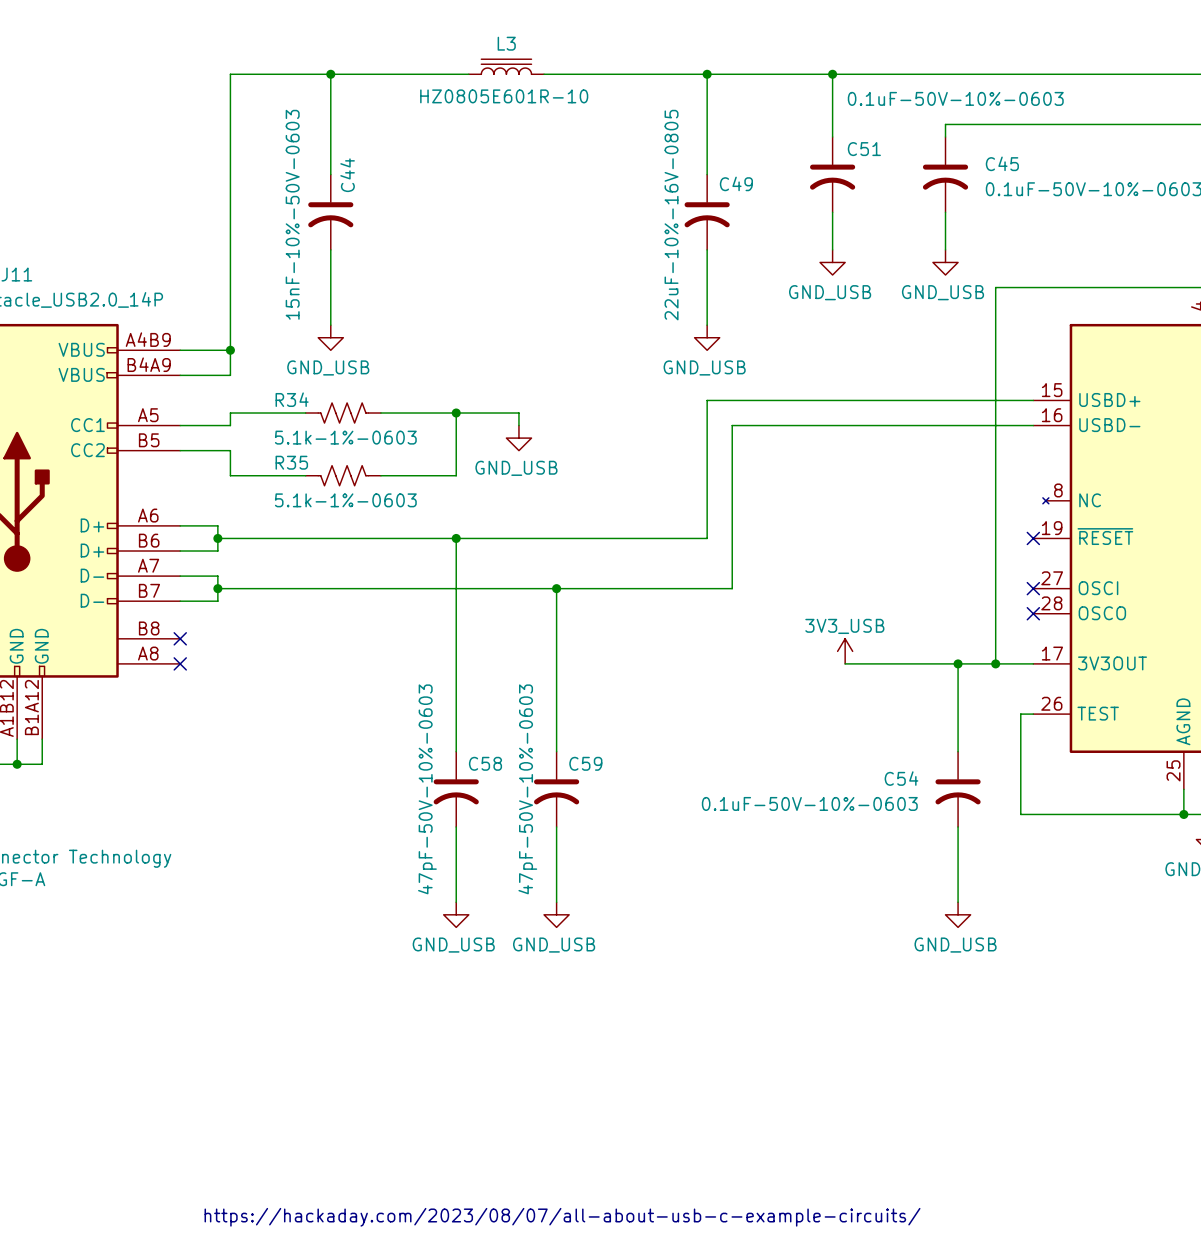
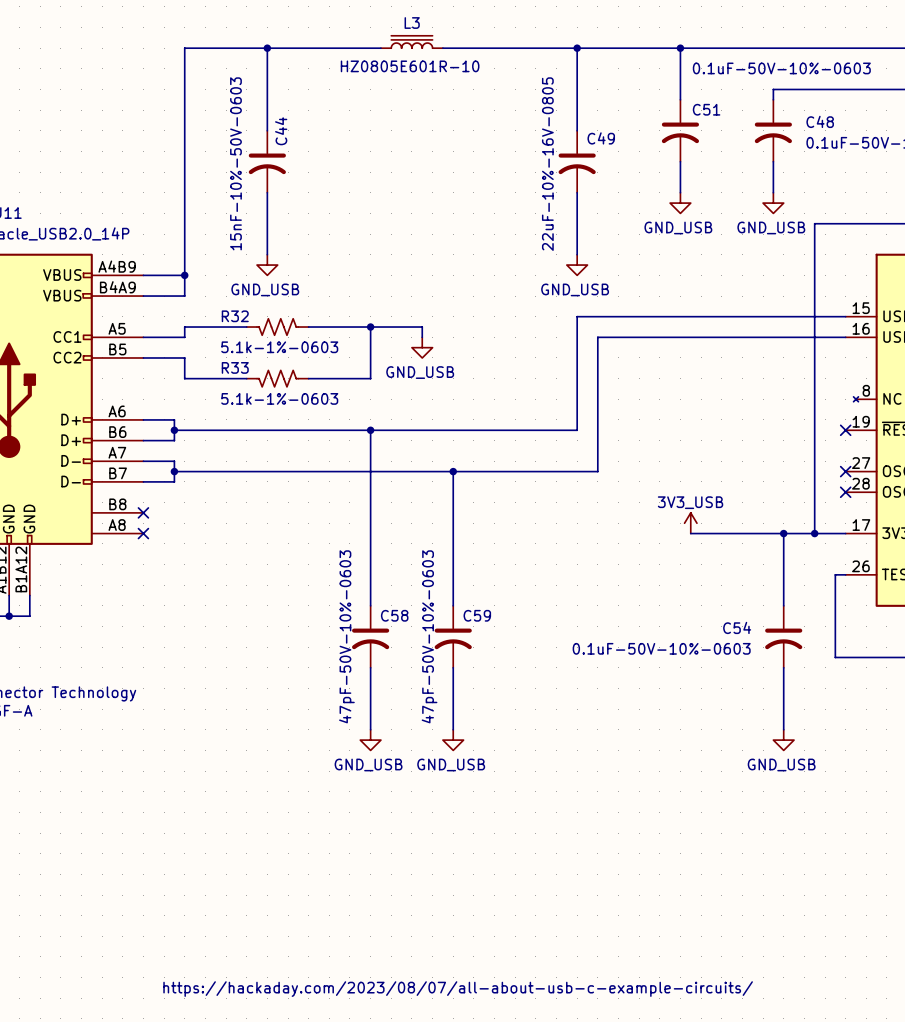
C45 name: C45 (1002, 163) -> C48 (820, 121)
R34 name: R34 (292, 399) -> R32 (235, 316)
R35 name: R35 (291, 462) -> R33 (235, 367)

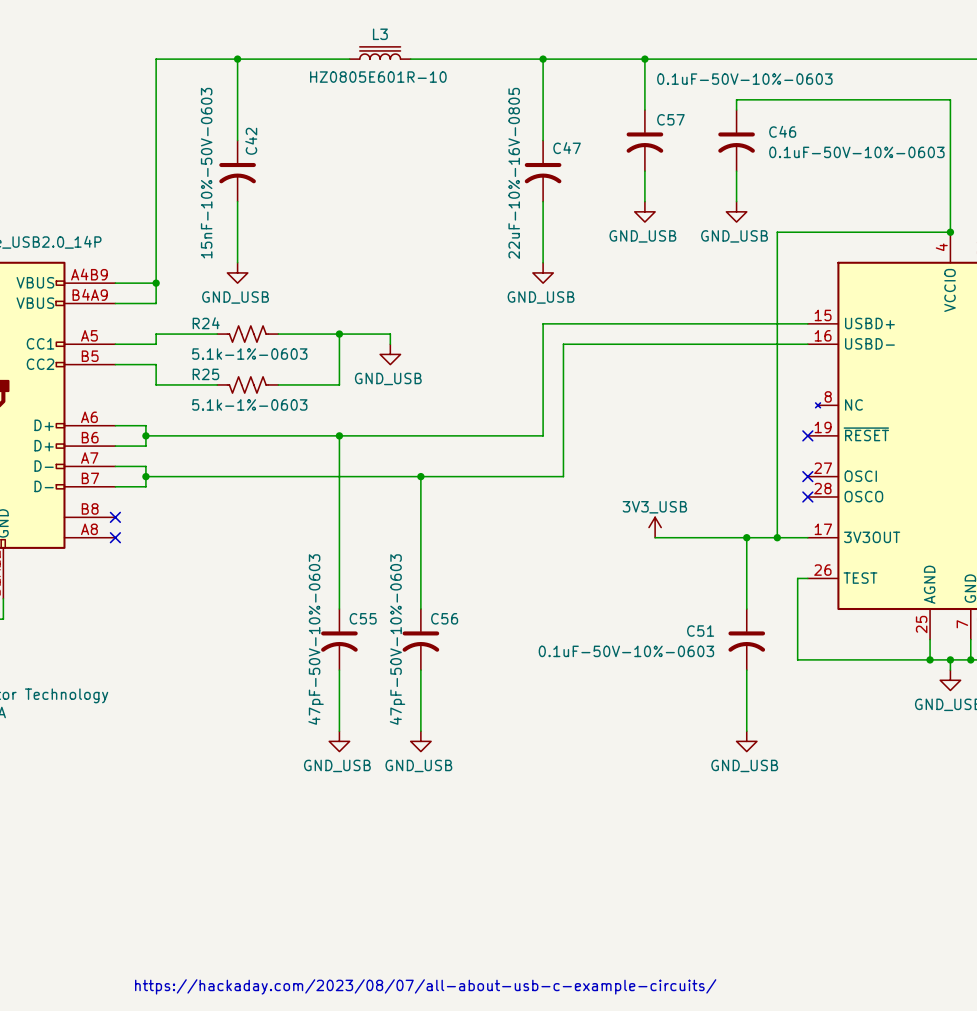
C51 name: C51 (706, 109) -> C57 (670, 119)
C48 name: C48 (820, 121) -> C46 (782, 131)
C44 name: C44 (281, 131) -> C42 (251, 141)
C49 name: C49 (601, 138) -> C47 (567, 148)
R32 name: R32 (235, 316) -> R24 (206, 323)
R33 name: R33 (235, 367) -> R25 (205, 374)
C58 name: C58 (394, 615) -> C55 (363, 618)
C59 name: C59 (477, 615) -> C56 (444, 618)
C54 name: C54 (737, 627) -> C51 (700, 631)

